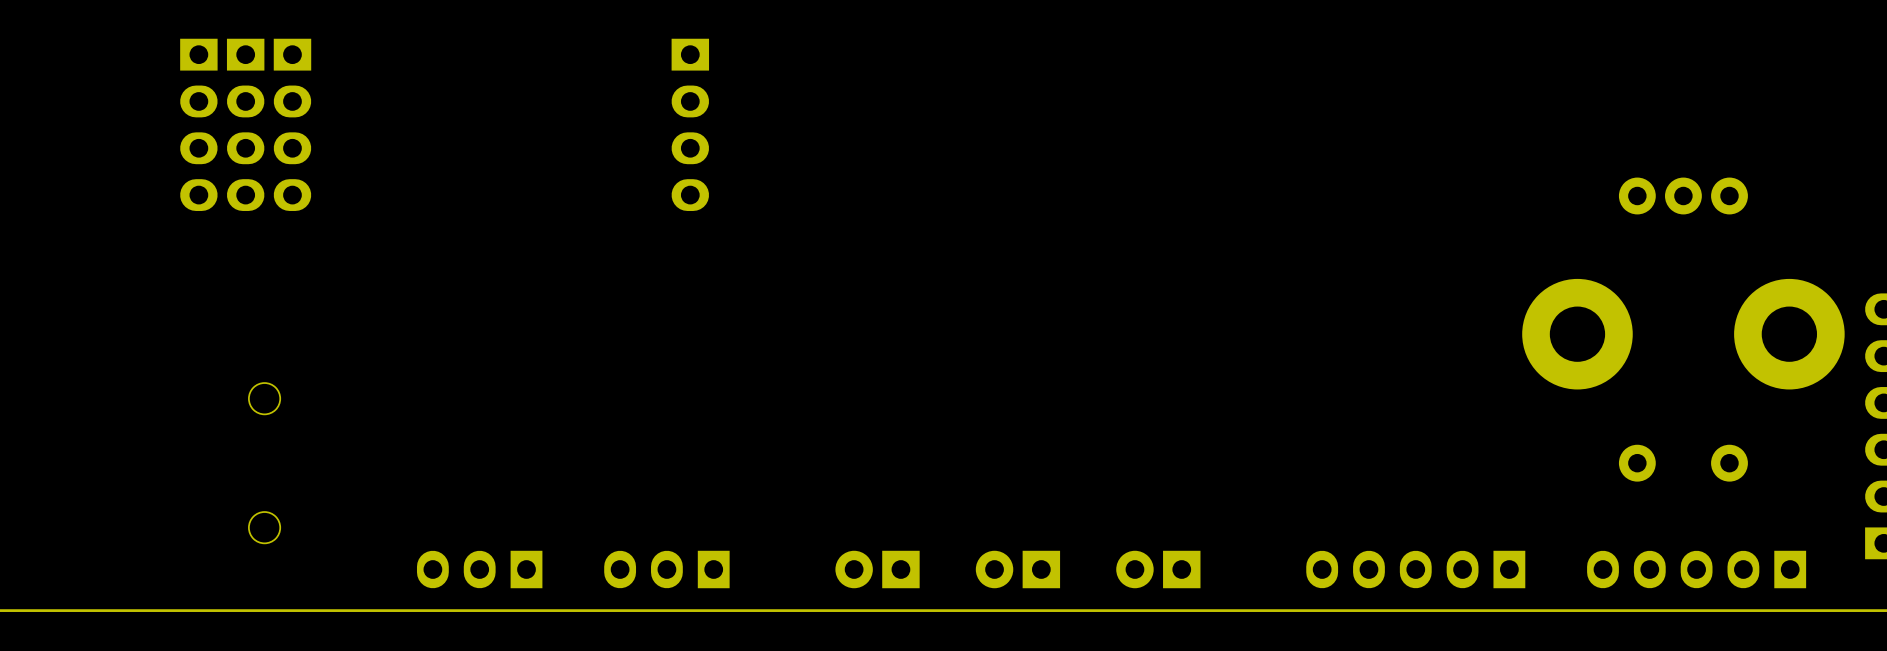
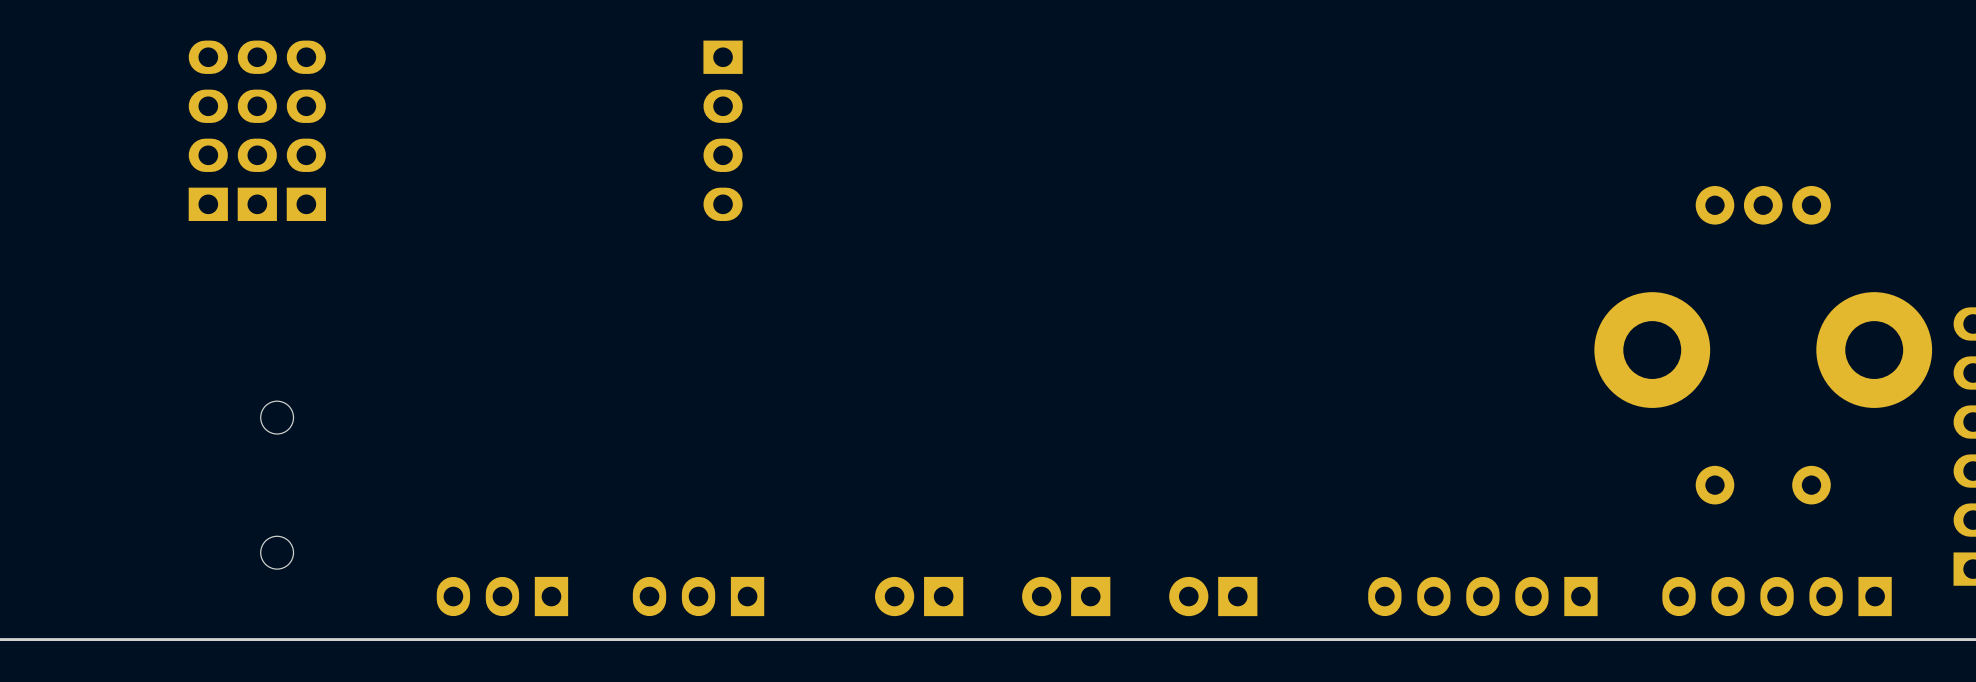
part rotation: 0° (198, 124) -> 180° (208, 130)
part rotation: 0° (245, 124) -> 180° (257, 130)
part rotation: 0° (292, 124) -> 180° (306, 130)

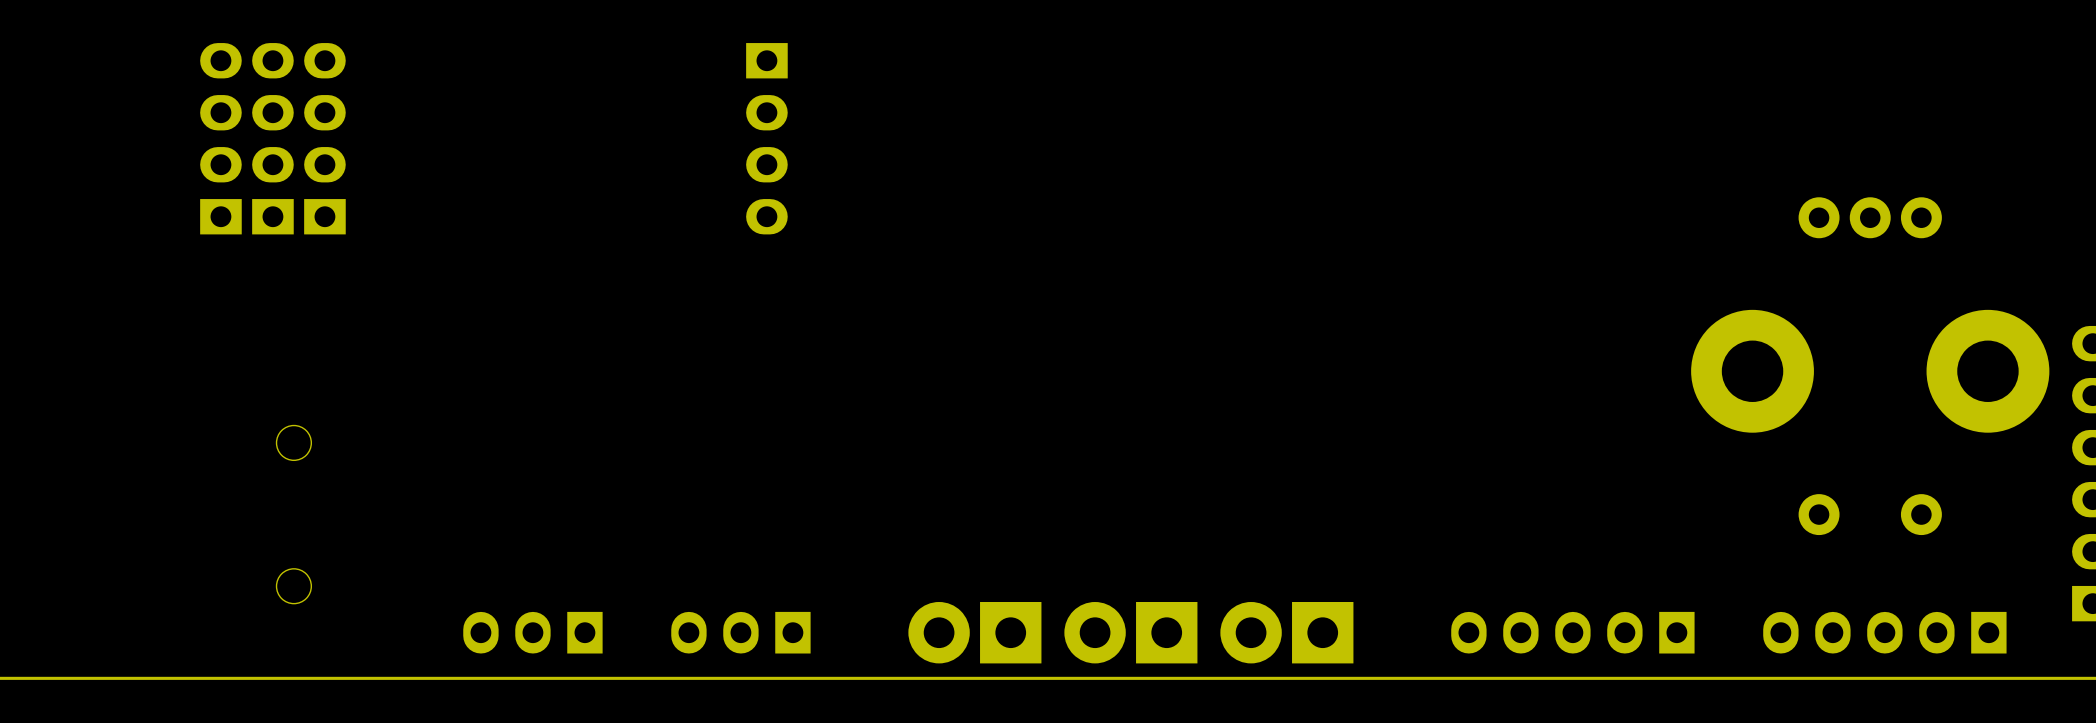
part footprint: [875, 576, 964, 617] -> [908, 602, 1042, 664]
part footprint: [1022, 576, 1111, 617] -> [1064, 602, 1198, 664]
part footprint: [1169, 576, 1258, 617] -> [1220, 602, 1354, 664]

